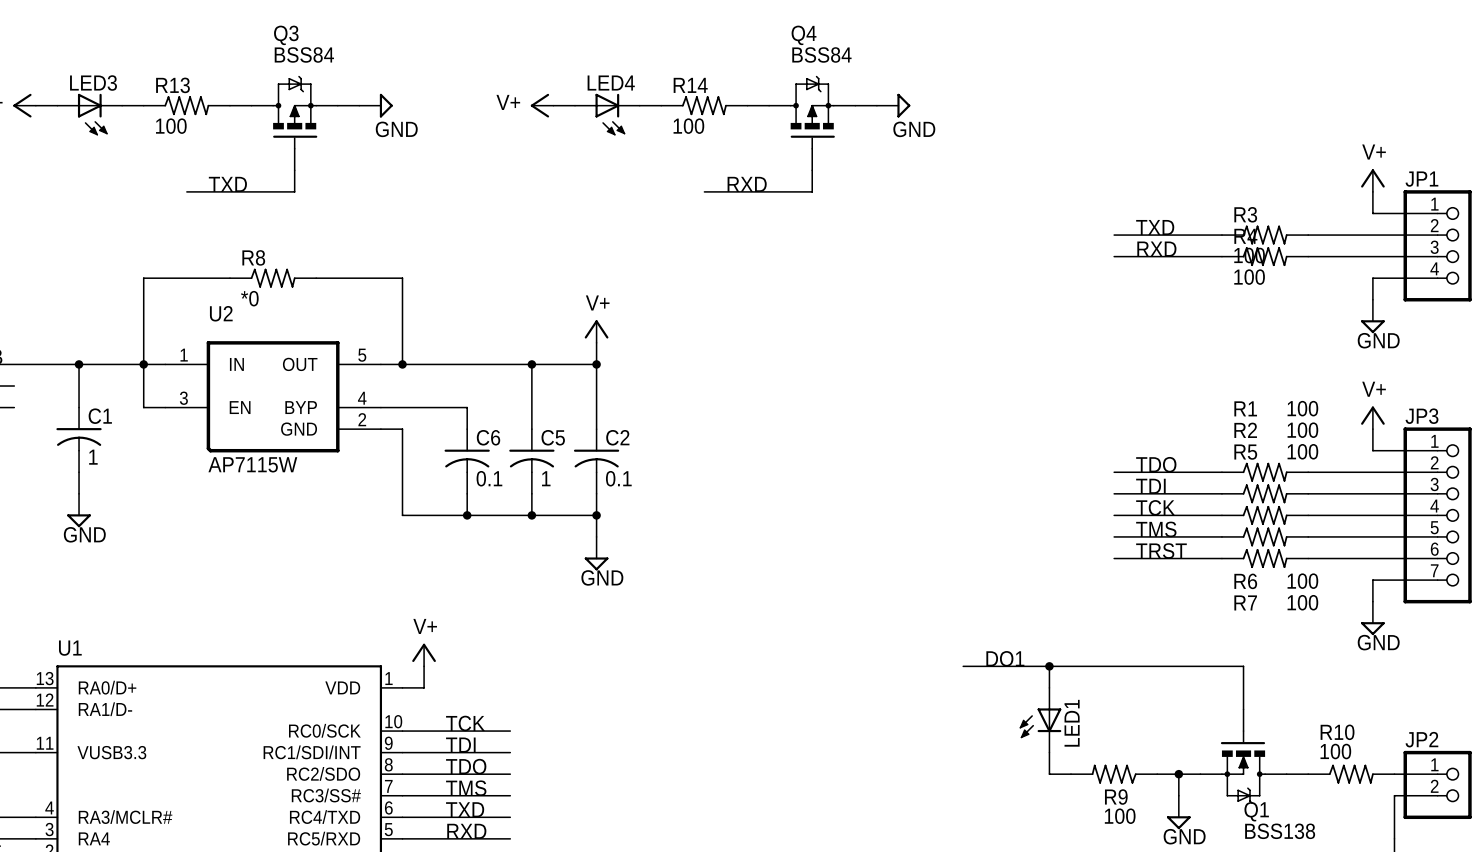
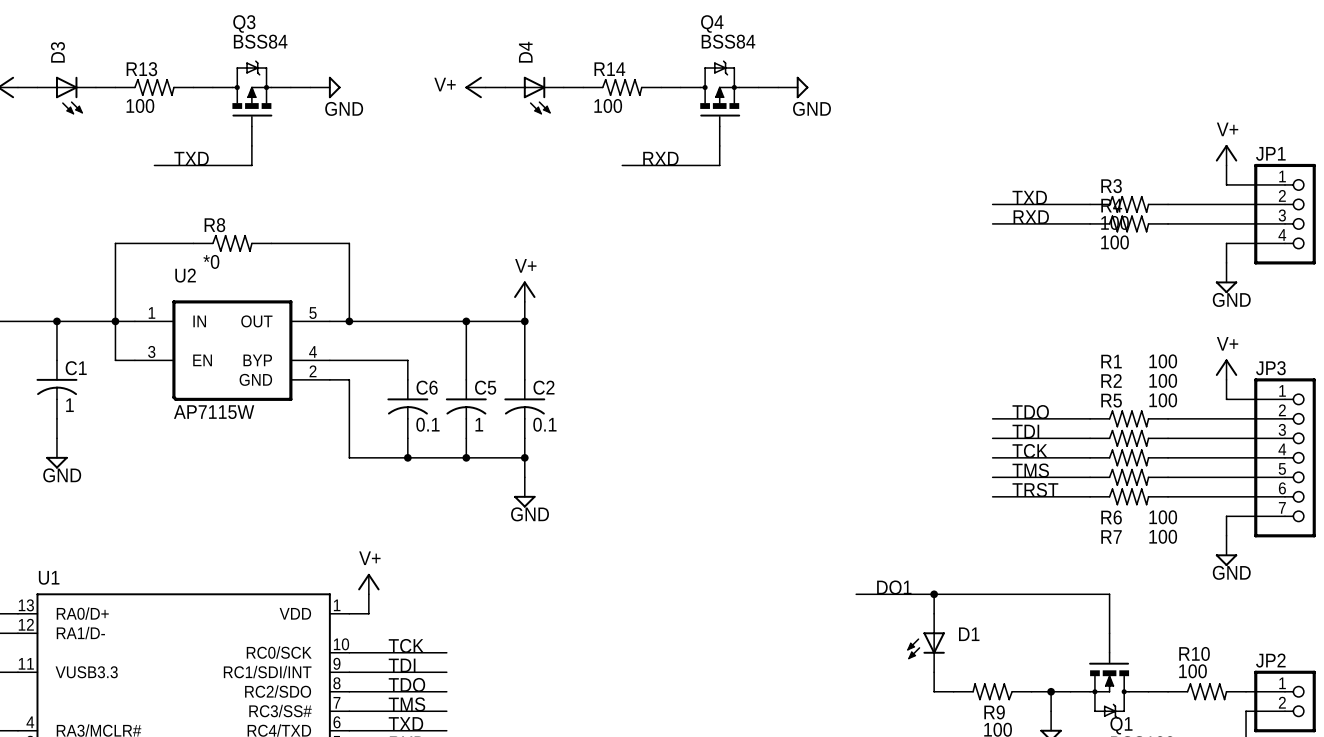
LED3 name: LED3 (93, 83) -> D3 (57, 52)
LED4 name: LED4 (611, 83) -> D4 (525, 52)
LED1 name: LED1 (1072, 723) -> D1 (969, 634)

